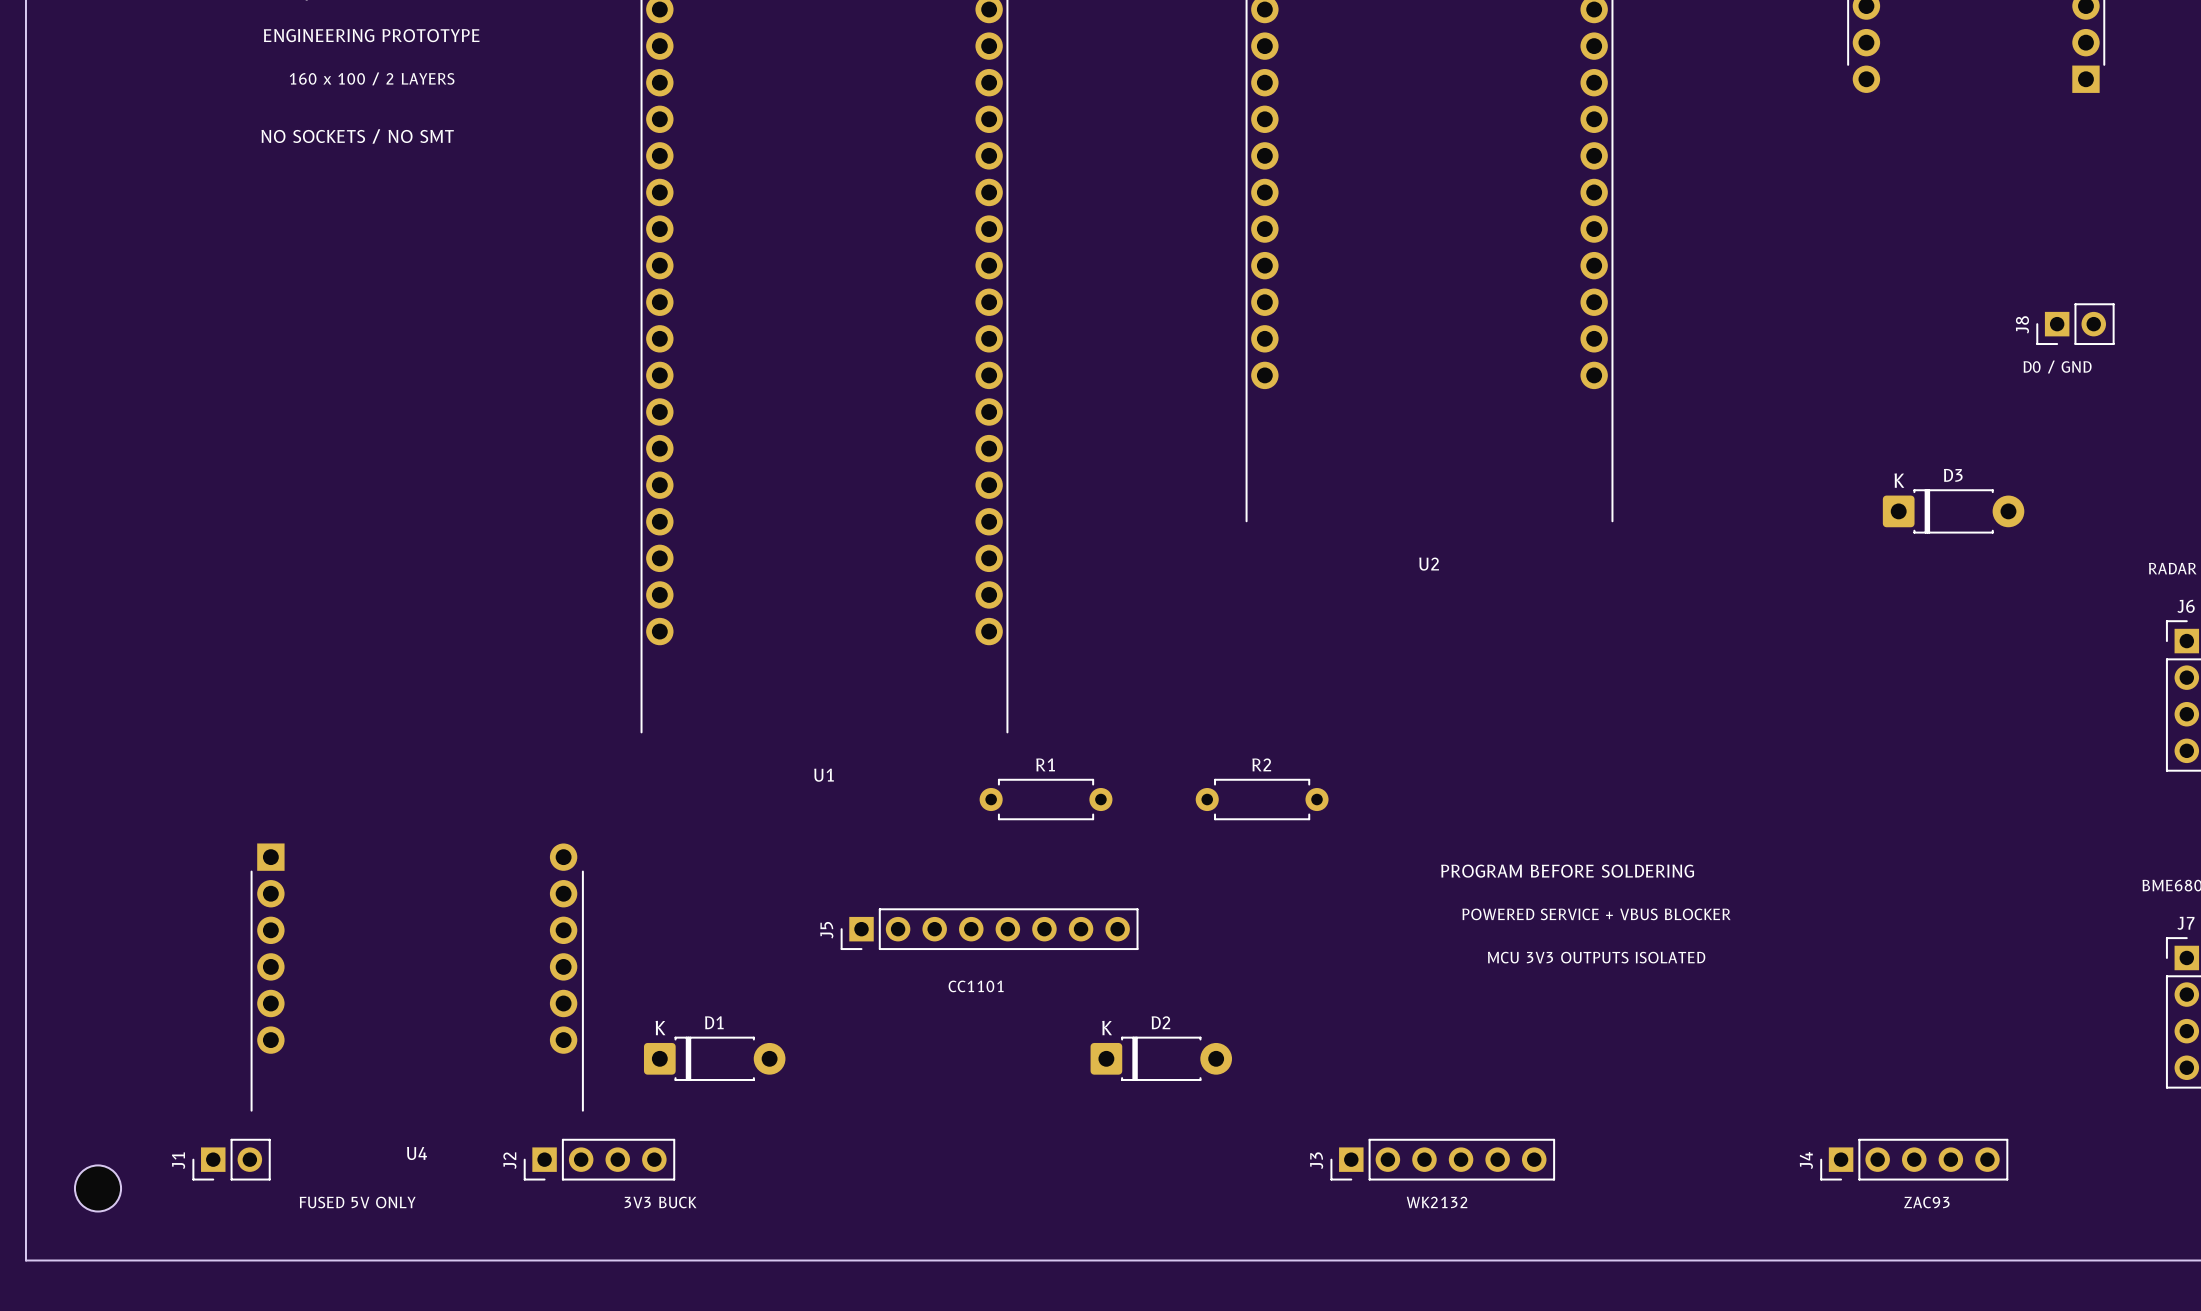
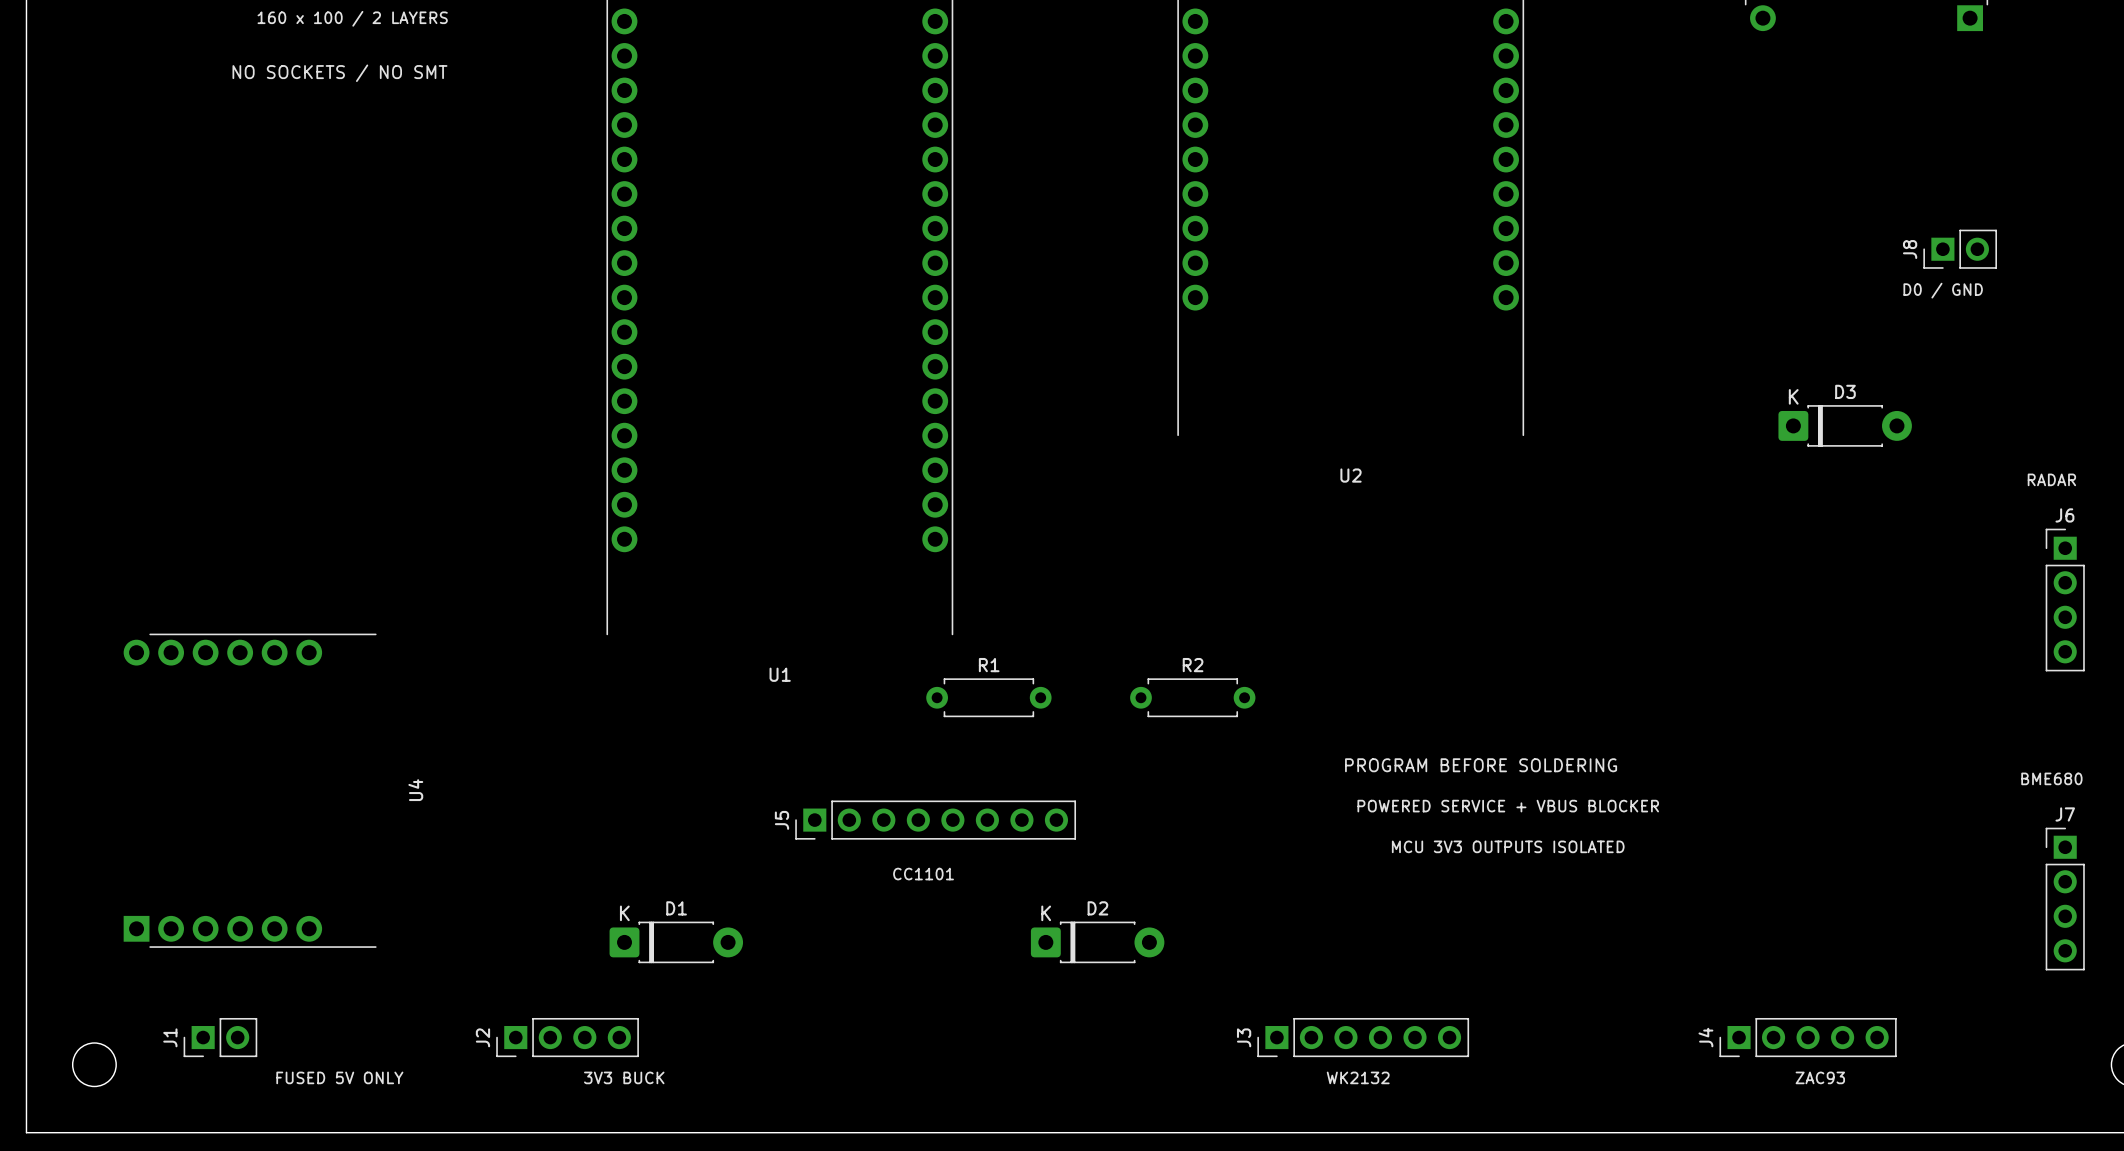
U4 rotation: 0° (417, 977) -> 90° counterclockwise (250, 790)

